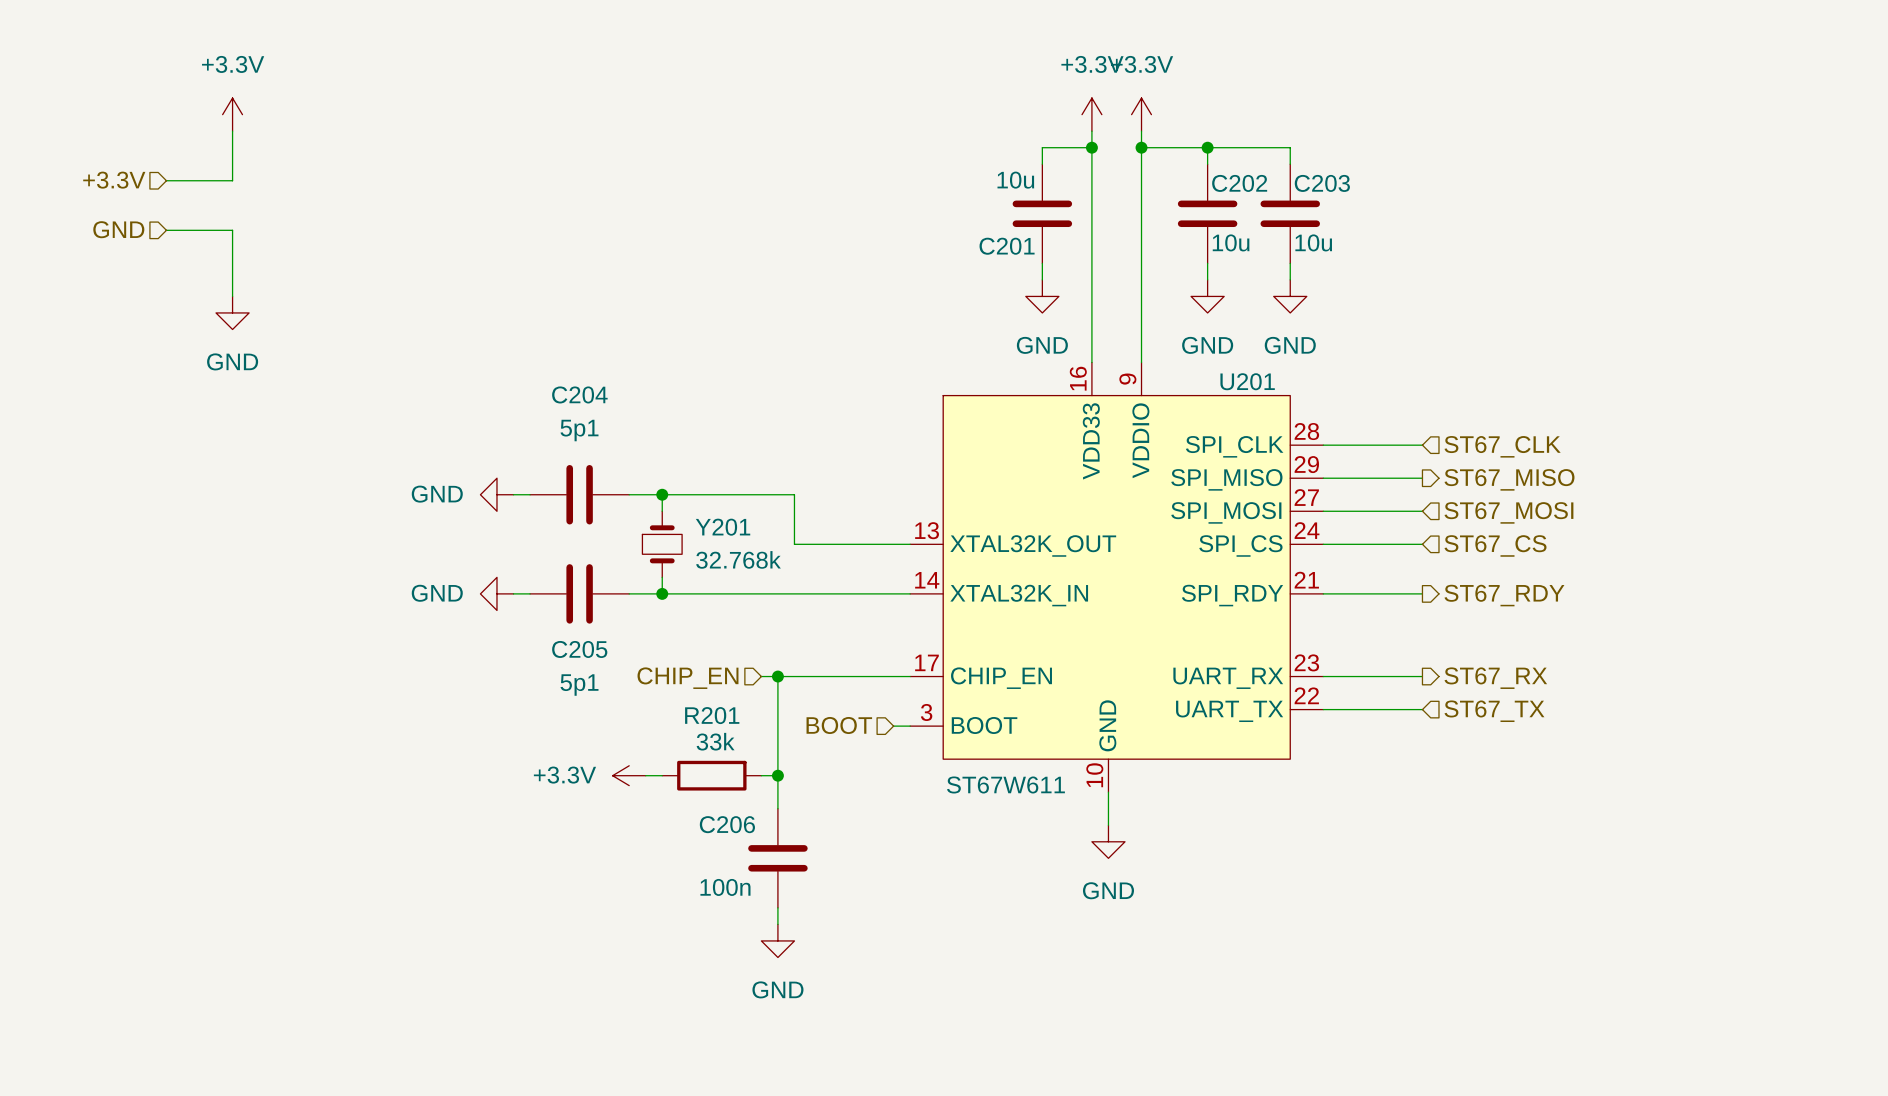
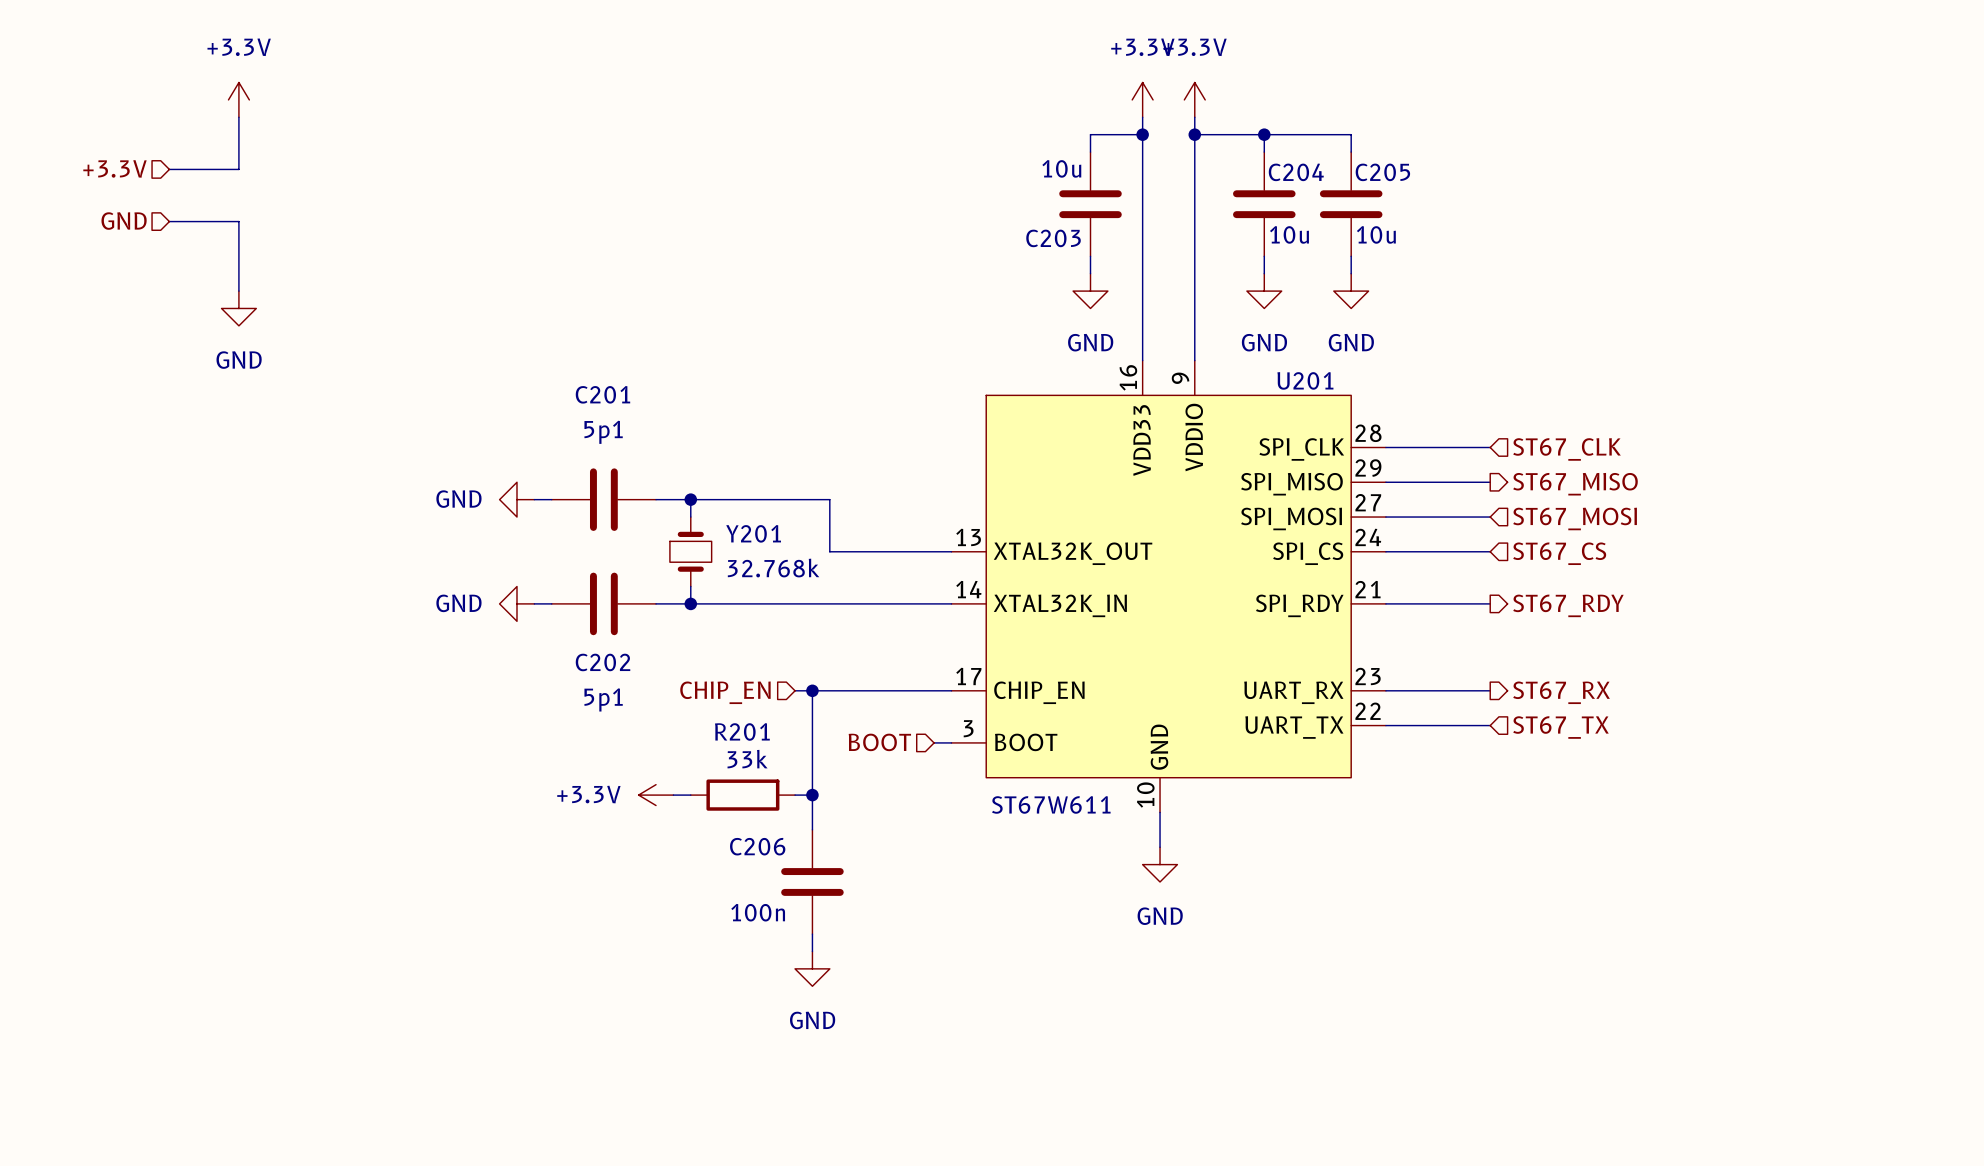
C202 name: C202 (1239, 183) -> C204 (1296, 172)
C203 name: C203 (1322, 183) -> C205 (1382, 172)
C201 name: C201 (1007, 246) -> C203 (1053, 238)
C204 name: C204 (579, 394) -> C201 (602, 394)
C205 name: C205 (579, 649) -> C202 (603, 662)

